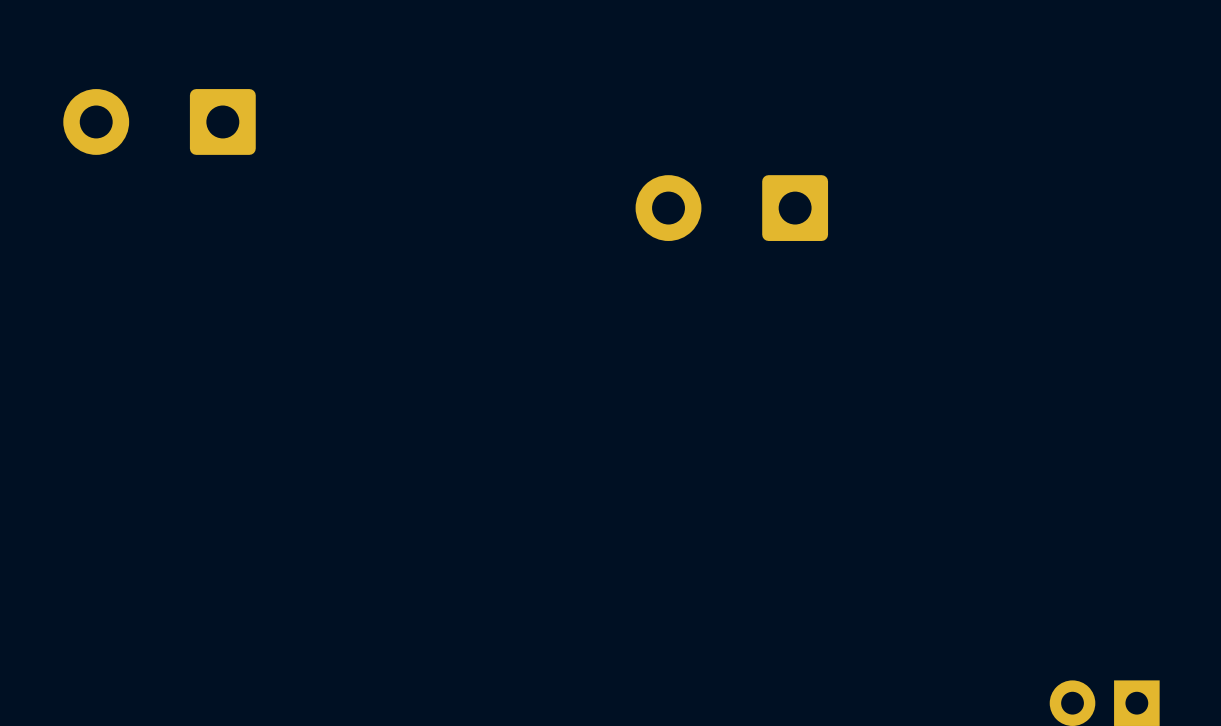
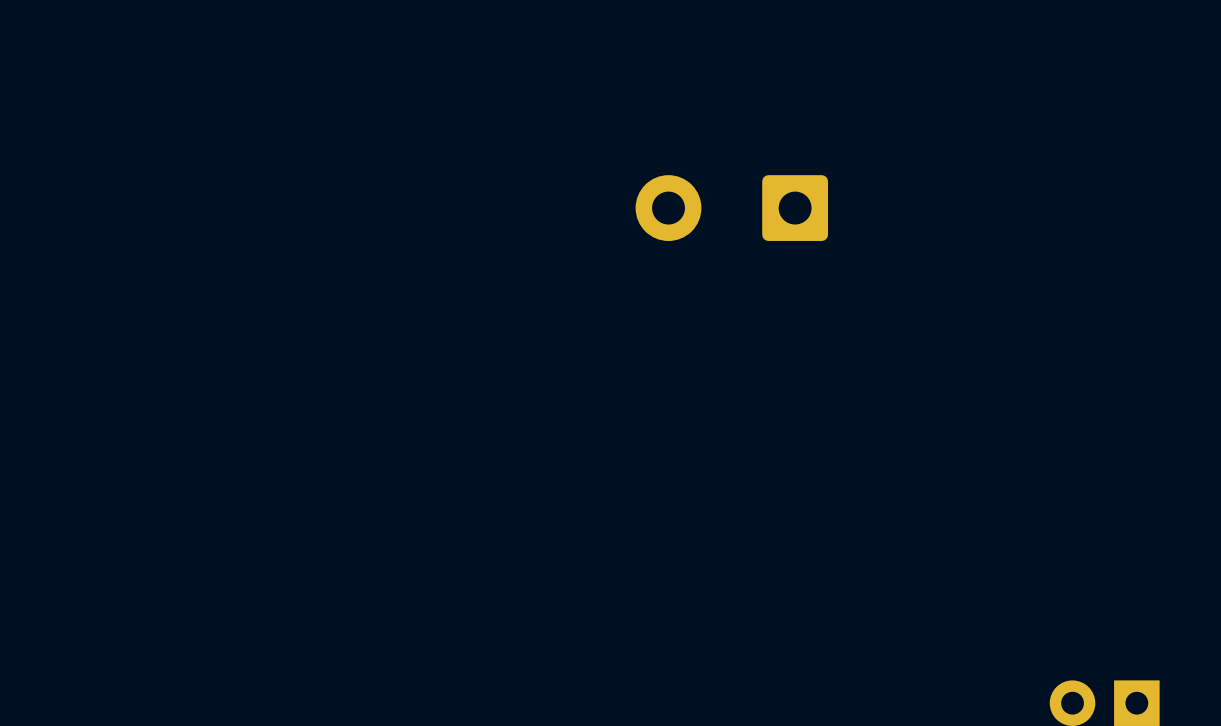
part: (159, 121) -> none

